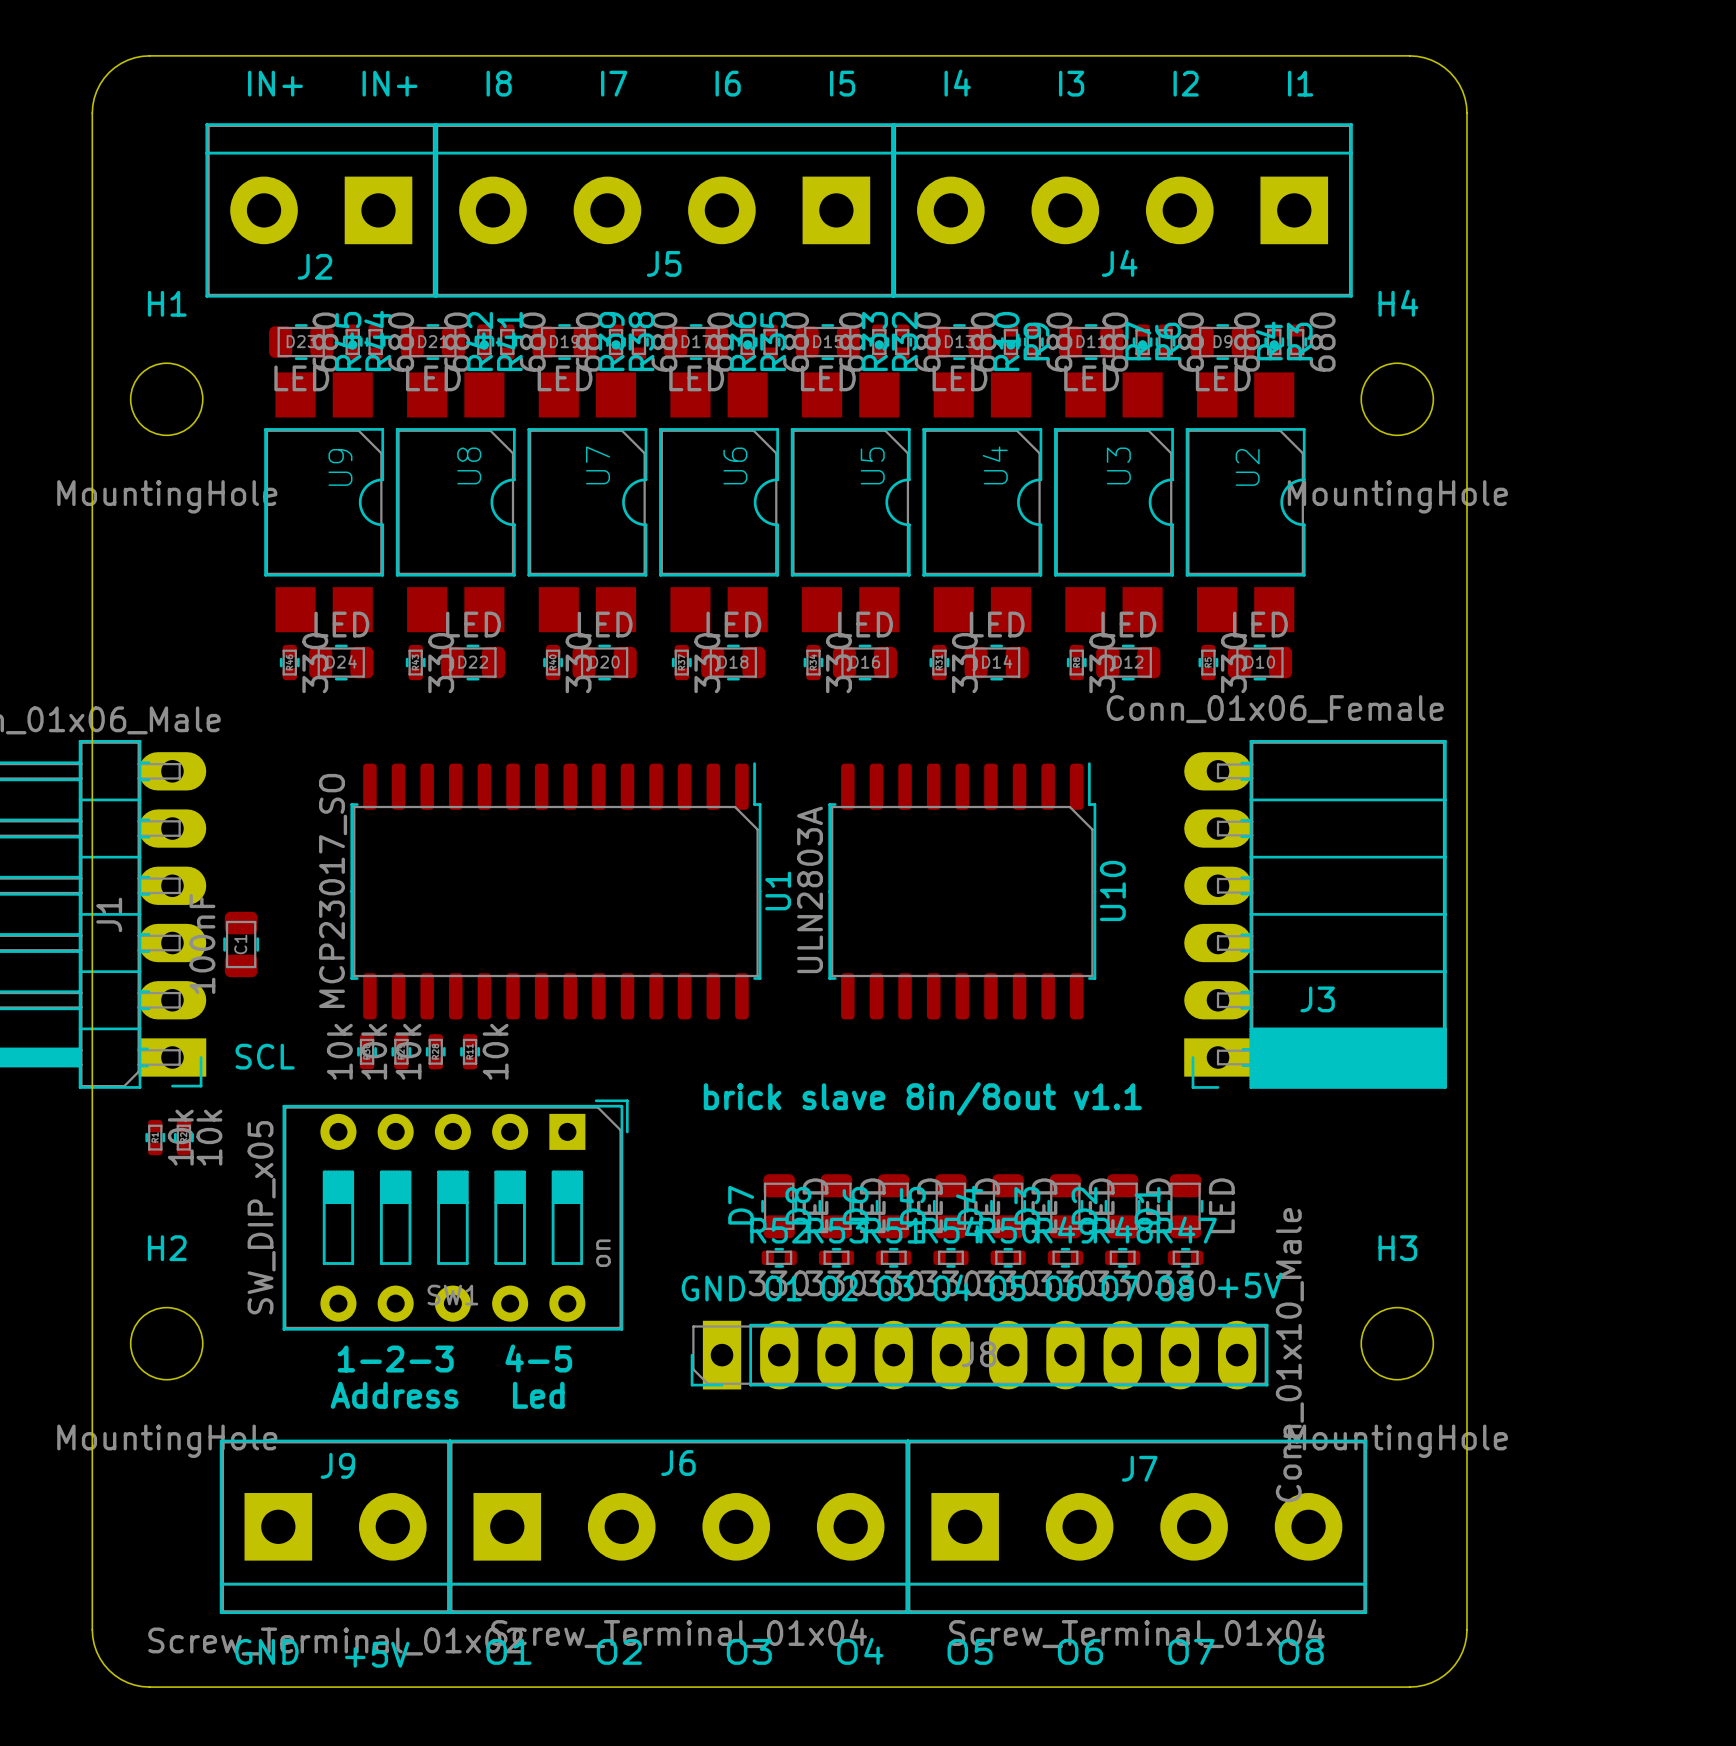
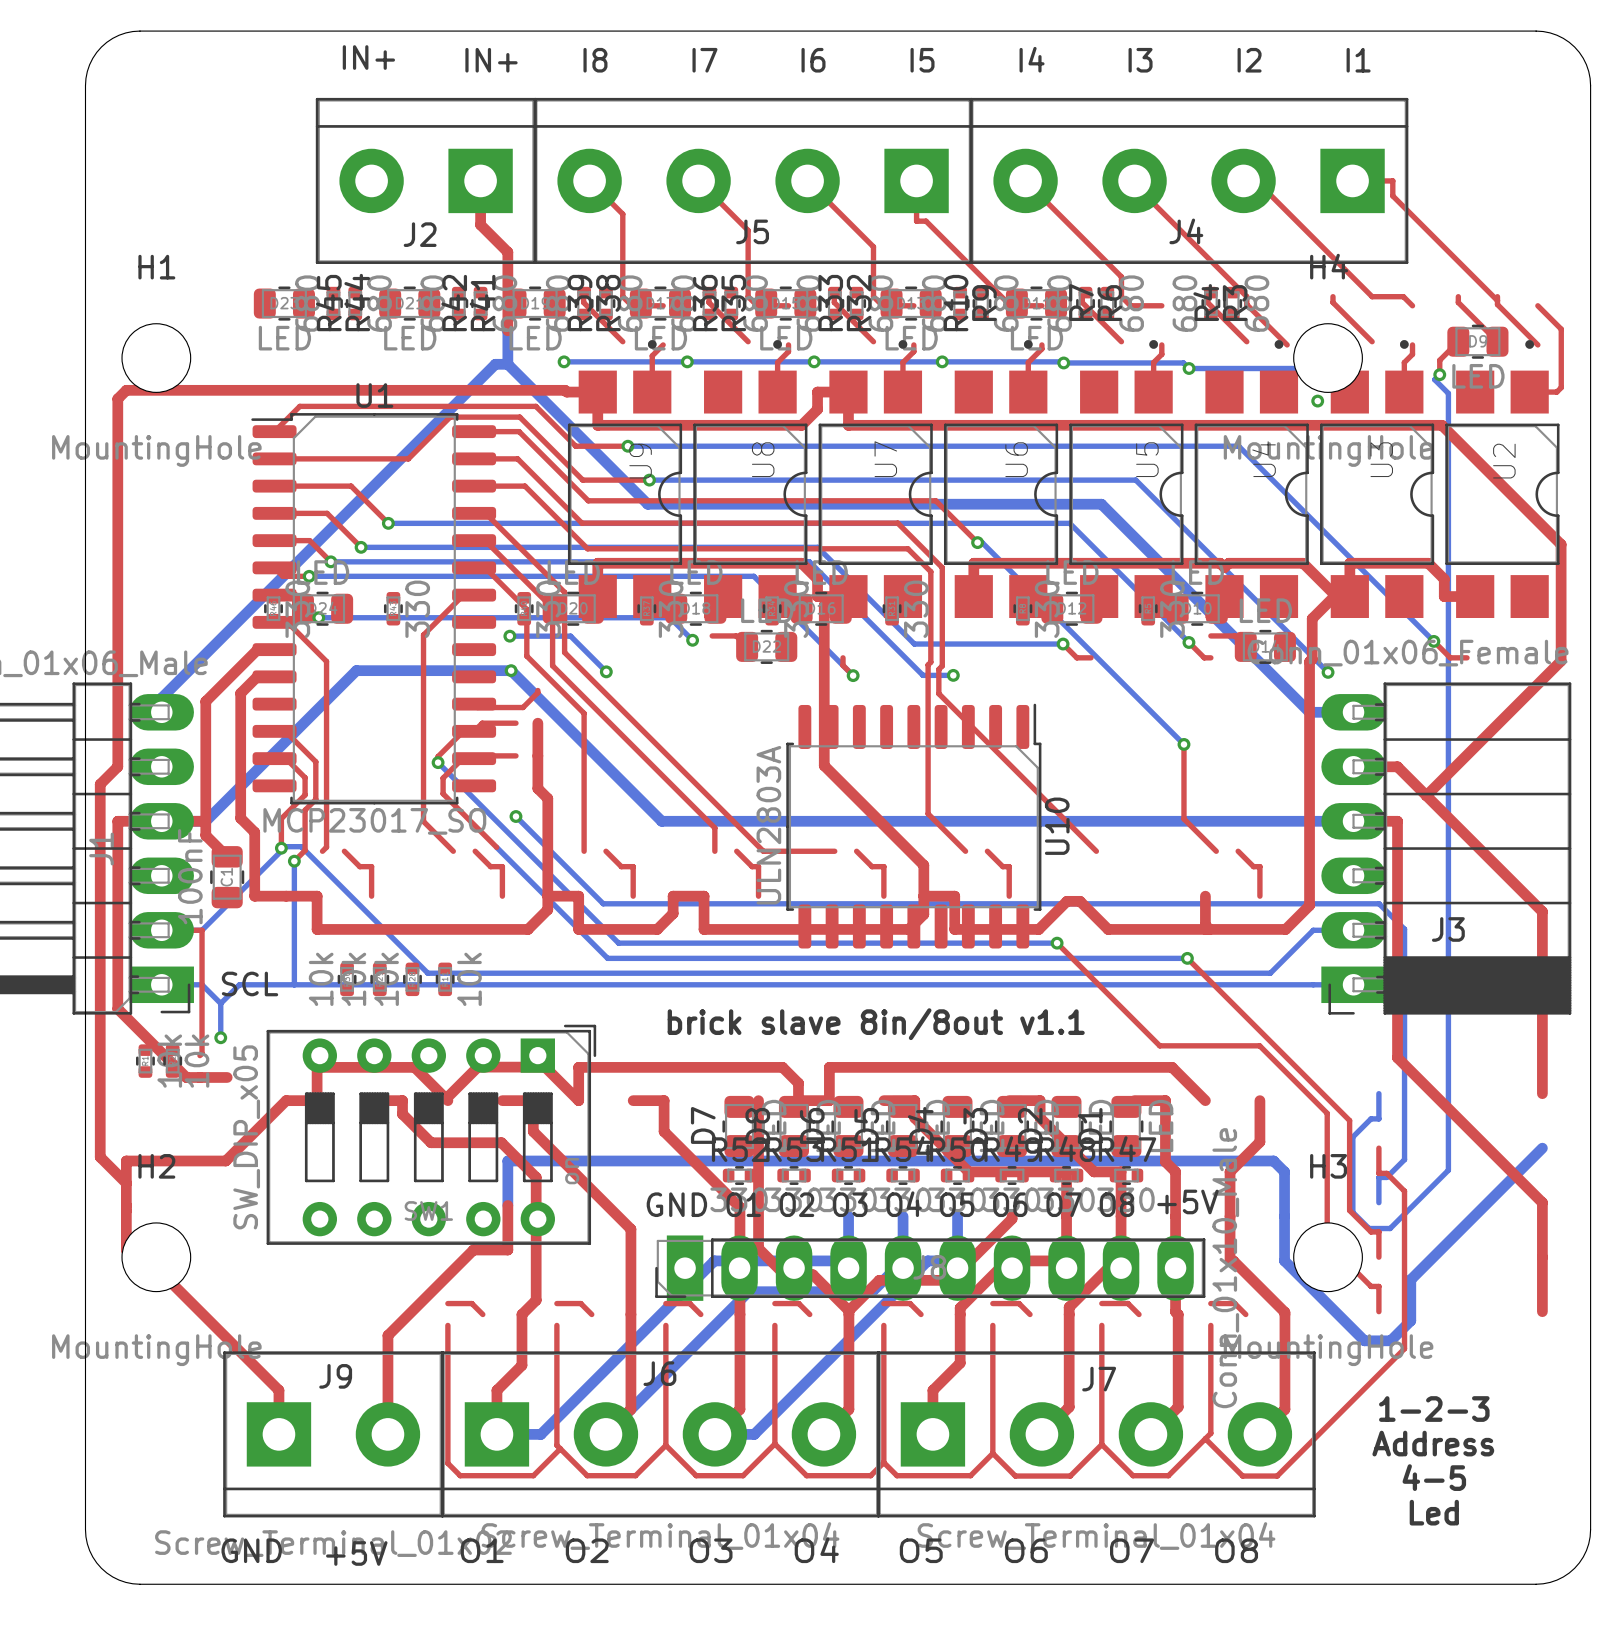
board edge: (1409, 55) (1431, 60) (1450, 72) (1462, 91) (1466, 113) (1466, 1629) -> (1339, 31) (1536, 31) (1550, 32) (1563, 38) (1579, 52) (1588, 71) (1590, 85) (1590, 1536) (1586, 1550) (1574, 1568) (1563, 1576) (1543, 1583) (1339, 1584)
text position: IN+ (275, 83) -> IN+ (491, 60)
text position: I8 I7 I6 I5 I4 I3 I2 I1 (899, 83) -> I8 I7 I6 I5 I4 I3 I2 I1 (977, 59)
J2 position: (321, 210) -> (426, 180)
J5 position: (664, 210) -> (753, 180)
J4 position: (1122, 210) -> (1189, 180)
top track: none -> (480, 180) (480, 224) (507, 252) (507, 330)
top track: none -> (589, 180) (622, 214) (622, 296) (631, 305) (663, 305)
top track: none -> (698, 180) (748, 230) (748, 296) (757, 305) (788, 305)
top track: none -> (807, 180) (873, 246) (873, 296) (882, 305) (913, 305)
top track: none -> (916, 180) (916, 221) (926, 221) (1010, 305) (1041, 305)
top track: none -> (1025, 180) (1121, 276) (1121, 296) (1130, 305) (1161, 305)
top track: none -> (1134, 180) (1134, 184) (1246, 296) (1246, 304) (1287, 344)
top track: none -> (1243, 180) (1256, 180) (1372, 296) (1403, 296) (1412, 305)
top track: none -> (1352, 180) (1392, 180) (1392, 195) (1497, 300)
top track: none -> (583, 296) (583, 302) (622, 341)
top track: none -> (708, 296) (708, 302) (748, 341)
top track: none -> (834, 296) (834, 302) (873, 341)
top track: none -> (1082, 296) (1082, 302) (1121, 341)
top track: none -> (1207, 296) (1207, 302) (1246, 341)
top track: none -> (1332, 296) (1332, 302) (1372, 341)
top track: none -> (1458, 296) (1458, 302) (1497, 341)
top track: none -> (1497, 296) (1497, 304) (1537, 344)
D9 position: (1222, 342) -> (1477, 341)
top track: none -> (1537, 305) (1561, 329) (1561, 387) (1556, 392) (1529, 392)
bottom track: none -> (507, 330) (507, 364)
top track: none -> (1458, 341) (1439, 360) (1439, 374)
top track: none -> (663, 344) (652, 355) (652, 392)
top track: none -> (788, 344) (788, 351) (777, 362) (777, 392)
top track: none -> (913, 344) (913, 351) (902, 362) (902, 392)
top track: none -> (1041, 344) (1041, 348) (1028, 362) (1028, 392)
top track: none -> (1161, 344) (1161, 354) (1153, 362) (1153, 392)
top track: none -> (1412, 344) (1412, 354) (1404, 362) (1404, 392)
bottom track: none -> (564, 361) (1183, 362) (1189, 368) (1306, 368) (1317, 379)
via: none -> (564, 361)
via: none -> (687, 361)
via: none -> (814, 361)
via: none -> (942, 361)
via: none -> (1063, 362)
bottom track: none -> (507, 364) (647, 504) (1101, 504) (1309, 712) (1353, 712)
bottom track: none -> (507, 364) (495, 364) (161, 697) (161, 712)
via: none -> (1189, 368)
bottom track: none -> (1439, 374) (1434, 379) (1448, 393) (1448, 1170) (1390, 1228) (1369, 1228) (1352, 1212) (1352, 1137) (1371, 1118) (1378, 1118) (1378, 1093)
via: none -> (1439, 374)
via: none -> (1317, 401)
top track: none -> (274, 431) (299, 406) (535, 406) (575, 446) (627, 446)
top track: none -> (474, 431) (519, 431) (588, 500) (935, 500) (977, 542)
U9 position: (324, 486) -> (625, 479)
U8 position: (455, 486) -> (750, 479)
U7 position: (587, 486) -> (875, 479)
U6 position: (719, 486) -> (1001, 479)
U5 position: (850, 486) -> (1126, 479)
U4 position: (982, 486) -> (1251, 479)
U3 position: (1113, 486) -> (1377, 479)
U2 position: (1245, 486) -> (1502, 479)
bottom track: none -> (627, 446) (1238, 446) (1433, 641)
via: none -> (627, 446)
top track: none -> (274, 458) (408, 458) (450, 417) (519, 417) (582, 480) (649, 480)
top track: none -> (474, 458) (517, 458) (581, 523) (897, 523) (942, 567) (942, 665) (938, 669) (938, 693) (1096, 851)
bottom track: none -> (649, 480) (1135, 480) (1328, 672)
via: none -> (649, 480)
top track: none -> (274, 486) (351, 486) (388, 523)
top track: none -> (474, 486) (524, 486) (587, 548) (907, 548) (930, 571) (930, 662) (928, 664) (928, 813) (965, 851)
top track: none -> (274, 513) (327, 513) (361, 547)
top track: none -> (474, 513) (485, 513) (564, 592) (564, 652) (763, 851) (834, 851)
bottom track: none -> (388, 523) (1069, 523) (1188, 642)
via: none -> (388, 523)
top track: none -> (274, 540) (309, 540) (330, 561)
top track: none -> (474, 540) (485, 540) (552, 608) (552, 665) (714, 827) (714, 851)
bottom track: none -> (977, 542) (982, 542) (1183, 744)
via: none -> (977, 542)
bottom track: none -> (361, 547) (817, 547) (914, 644) (1063, 644)
via: none -> (361, 547)
bottom track: none -> (330, 561) (809, 561) (922, 675) (953, 675)
via: none -> (330, 561)
top track: none -> (274, 567) (283, 576) (309, 576)
top track: none -> (474, 567) (485, 567) (526, 609) (526, 656) (584, 713) (584, 851)
bottom track: none -> (309, 576) (753, 576) (853, 675)
via: none -> (309, 576)
top track: none -> (474, 595) (463, 595) (423, 635) (423, 821) (453, 851)
top track: none -> (597, 596) (597, 563) (801, 563) (817, 579) (817, 596) (848, 596)
top track: none -> (833, 596) (824, 605) (824, 765) (923, 865) (923, 914) (908, 929) (704, 929) (704, 896) (673, 896) (673, 913) (657, 929) (578, 929) (578, 896) (547, 896)
top track: none -> (973, 596) (973, 563) (1220, 563) (1224, 567) (1228, 563) (1303, 563) (1334, 596)
top track: none -> (1334, 596) (1312, 618) (1312, 659) (1309, 661) (1309, 905) (1285, 929) (1209, 929) (1205, 925)
top track: none -> (1334, 596) (1349, 596) (1349, 563) (1428, 563) (1444, 579) (1444, 596) (1475, 596)
D22 position: (472, 662) -> (766, 646)
D14 position: (996, 662) -> (1265, 646)
bottom track: none -> (318, 617) (670, 617) (692, 640)
via: none -> (318, 617)
top track: none -> (274, 622) (287, 622) (326, 661) (326, 847) (322, 851)
bottom track: none -> (509, 636) (570, 636) (606, 671)
via: none -> (509, 636)
top track: none -> (712, 635) (736, 635) (747, 646)
top track: none -> (1210, 635) (1234, 635) (1245, 646)
via: none -> (692, 640)
top track: none -> (1433, 641) (1450, 657) (1467, 657)
via: none -> (1433, 641)
top track: none -> (1188, 642) (1204, 657) (1210, 657)
via: none -> (1188, 642)
top track: none -> (1063, 644) (1076, 657) (1090, 657)
via: none -> (1063, 644)
top track: none -> (274, 649) (257, 649) (205, 701) (205, 835) (227, 856)
top track: none -> (843, 657) (843, 665) (853, 675)
via: none -> (511, 670)
via: none -> (606, 671)
via: none -> (1328, 672)
via: none -> (853, 675)
via: none -> (953, 675)
top track: none -> (274, 676) (257, 676) (240, 693) (240, 818) (254, 832) (254, 896) (317, 896) (317, 929) (528, 929) (547, 909) (547, 798) (537, 788) (537, 723)
top track: none -> (537, 690) (523, 707) (477, 707) (474, 704)
top track: none -> (515, 723) (482, 723) (474, 731) (463, 731) (438, 756) (438, 762)
top track: none -> (274, 731) (285, 731) (315, 761) (315, 799) (305, 810) (305, 850) (294, 861)
top track: none -> (1183, 744) (1183, 818) (1216, 851)
via: none -> (1183, 744)
top track: none -> (515, 755) (476, 755) (474, 758) (462, 758) (443, 778) (443, 793) (496, 847)
top track: none -> (274, 758) (285, 758) (305, 777) (305, 795) (281, 818) (281, 848)
bottom track: none -> (438, 762) (618, 943) (1057, 943)
via: none -> (438, 762)
top track: none -> (1353, 766) (1397, 766) (1542, 911) (1542, 1093)
top track: none -> (1426, 795) (1561, 661) (1561, 544) (1441, 425) (848, 425) (848, 392) (817, 392) (817, 409) (801, 425) (597, 425) (597, 392) (566, 392) (565, 390) (126, 390) (117, 398) (117, 766) (100, 784) (100, 1157) (126, 1183)
bottom track: none -> (515, 816) (603, 903) (1379, 903) (1404, 929) (1404, 1159) (1386, 1177) (1378, 1177) (1378, 1202)
via: none -> (515, 816)
bottom track: none -> (161, 821) (205, 821) (356, 670) (511, 670) (661, 821) (1353, 821)
top track: none -> (205, 821) (117, 821) (117, 1008) (186, 1077) (227, 1077)
top track: none -> (1353, 821) (1397, 821) (1397, 1057) (1542, 1202) (1542, 1311)
U1 rotation: 0° (555, 890) -> 90° counterclockwise (373, 608)
U1 position: (555, 890) -> (373, 608)
bottom track: none -> (496, 847) (607, 958) (1187, 958)
via: none -> (281, 848)
J3 position: (1315, 914) -> (1446, 848)
top track: none -> (344, 851) (359, 866) (371, 866) (371, 896)
top track: none -> (475, 851) (490, 866) (502, 866) (502, 896)
top track: none -> (605, 851) (621, 866) (633, 866) (633, 896)
top track: none -> (736, 851) (752, 866) (758, 866) (758, 896)
top track: none -> (856, 851) (872, 866) (883, 866) (883, 896)
top track: none -> (987, 851) (1002, 866) (1009, 866) (1009, 896)
top track: none -> (1238, 851) (1253, 866) (1259, 866) (1259, 896)
bottom track: none -> (294, 861) (294, 984)
via: none -> (294, 861)
top track: none -> (923, 896) (954, 896) (954, 929) (1038, 929) (1066, 901) (1080, 901) (1108, 929) (1205, 929) (1205, 896)
top track: none -> (161, 930) (202, 930) (202, 1053) (199, 1055)
bottom track: none -> (161, 930) (202, 930) (281, 850) (282, 846) (301, 846) (427, 973) (1270, 973) (1313, 930) (1353, 930)
top track: none -> (1057, 943) (1159, 1045) (1259, 1045) (1327, 1113) (1327, 1242) (1371, 1286) (1378, 1286) (1378, 1311)
via: none -> (1057, 943)
top track: none -> (1187, 958) (1349, 1120) (1349, 1210) (1371, 1231) (1378, 1231) (1378, 1257)
via: none -> (1187, 958)
bottom track: none -> (161, 984) (202, 984) (220, 1003)
bottom track: none -> (1353, 984) (239, 984) (220, 1003)
bottom track: none -> (220, 1003) (220, 1037)
via: none -> (220, 1037)
top track: none -> (446, 1098) (477, 1067) (545, 1067) (578, 1100) (578, 1067) (782, 1067) (798, 1083) (798, 1100) (829, 1100) (829, 1067) (1172, 1067) (1205, 1100)
top track: none -> (371, 1100) (402, 1100) (402, 1114) (431, 1142) (501, 1142) (536, 1177) (536, 1300) (521, 1314) (521, 1365) (496, 1390) (496, 1434)
top track: none -> (447, 1100) (414, 1067) (317, 1067) (317, 1100) (286, 1100) (225, 1160) (126, 1160) (126, 1250) (138, 1250) (278, 1390) (278, 1434)
top track: none -> (502, 1100) (533, 1100) (533, 1131) (630, 1229) (630, 1409) (605, 1434)
top track: none -> (633, 1100) (664, 1100) (664, 1131) (739, 1207) (739, 1409) (714, 1434)
top track: none -> (758, 1100) (758, 1248) (784, 1274) (813, 1274) (848, 1310)
top track: none -> (883, 1100) (914, 1100) (914, 1118) (968, 1171) (1066, 1171) (1066, 1260) (1007, 1260) (960, 1307) (960, 1363) (932, 1390) (932, 1434)
top track: none -> (1009, 1100) (1040, 1100) (1040, 1118) (1093, 1171) (1121, 1171) (1121, 1260) (1115, 1260) (1069, 1307) (1069, 1407) (1041, 1434)
top track: none -> (1134, 1100) (1165, 1100) (1165, 1161) (1175, 1171) (1175, 1311) (1178, 1314) (1178, 1407) (1150, 1434)
top track: none -> (1259, 1100) (1259, 1142) (1230, 1171) (1230, 1260) (1233, 1260) (1284, 1312) (1284, 1409) (1259, 1434)
top track: none -> (1378, 1148) (1378, 1173) (1386, 1173) (1404, 1191) (1404, 1348) (1277, 1476) (1242, 1476) (1205, 1438)
bottom track: none -> (1542, 1148) (1410, 1279) (1410, 1320) (1390, 1340) (1364, 1340) (1284, 1260) (1284, 1171) (1273, 1160) (507, 1160) (507, 1205)
top track: none -> (507, 1205) (507, 1250) (473, 1250) (387, 1335) (387, 1434)
bottom track: none -> (848, 1216) (848, 1260) (714, 1260) (540, 1434) (496, 1434)
bottom track: none -> (903, 1216) (903, 1260) (872, 1291) (748, 1291) (605, 1434)
bottom track: none -> (957, 1216) (957, 1260) (927, 1260) (754, 1434) (714, 1434)
top track: none -> (1012, 1216) (1012, 1218) (950, 1280) (879, 1280) (848, 1310)
text: 4-5 (538, 1358) -> none
text: 1-2-3 (395, 1359) -> none
top track: none -> (447, 1303) (471, 1303) (482, 1314)
top track: none -> (556, 1303) (580, 1303) (591, 1314)
top track: none -> (665, 1303) (689, 1303) (700, 1314)
top track: none -> (774, 1303) (798, 1303) (809, 1314)
top track: none -> (883, 1303) (910, 1303) (921, 1314)
top track: none -> (992, 1303) (1019, 1303) (1030, 1314)
top track: none -> (1101, 1303) (1128, 1303) (1139, 1314)
top track: none -> (1210, 1303) (1234, 1303) (1245, 1314)
text: Address (394, 1395) -> none
text: Led (538, 1395) -> none
top track: none -> (848, 1310) (848, 1409) (823, 1434)
top track: none -> (447, 1325) (447, 1463) (460, 1475) (533, 1475) (560, 1448)
top track: none -> (556, 1325) (556, 1445) (587, 1475) (635, 1475) (665, 1445)
top track: none -> (665, 1325) (665, 1445)
top track: none -> (774, 1325) (774, 1443)
top track: none -> (883, 1325) (883, 1462)
top track: none -> (992, 1325) (992, 1453)
top track: none -> (1101, 1325) (1101, 1444)
top track: none -> (1210, 1325) (1210, 1433) (1168, 1475) (1133, 1475) (1101, 1444)
text: none -> 1-2-3 (1434, 1409)
J9 position: (335, 1526) -> (333, 1434)
J6 position: (678, 1526) -> (660, 1434)
J7 position: (1136, 1526) -> (1096, 1434)
top track: none -> (774, 1443) (743, 1475) (696, 1475) (665, 1445)
top track: none -> (774, 1443) (806, 1475) (870, 1475) (883, 1462)
text: none -> Address (1433, 1443)
top track: none -> (1101, 1444) (1070, 1476) (1015, 1476) (992, 1453)
top track: none -> (992, 1453) (970, 1475) (896, 1475) (883, 1462)
text: none -> 4-5 (1434, 1477)
text: none -> Led (1434, 1512)
board edge: (1466, 1629) (1462, 1651) (1450, 1670) (1431, 1682) (1409, 1687) -> none

